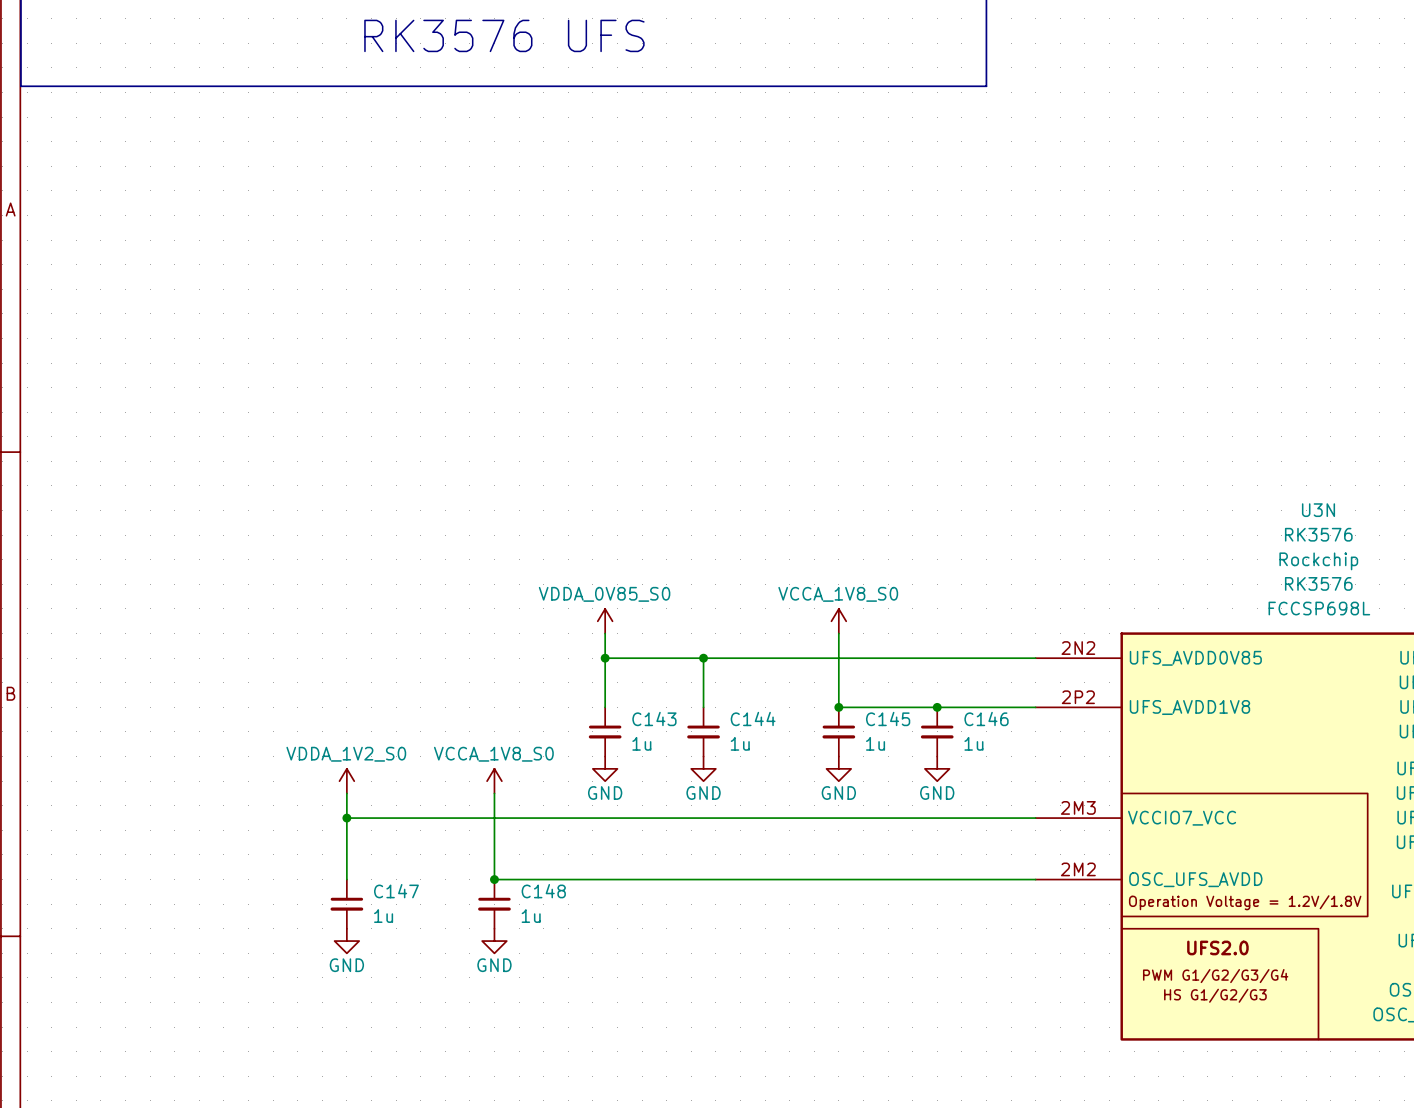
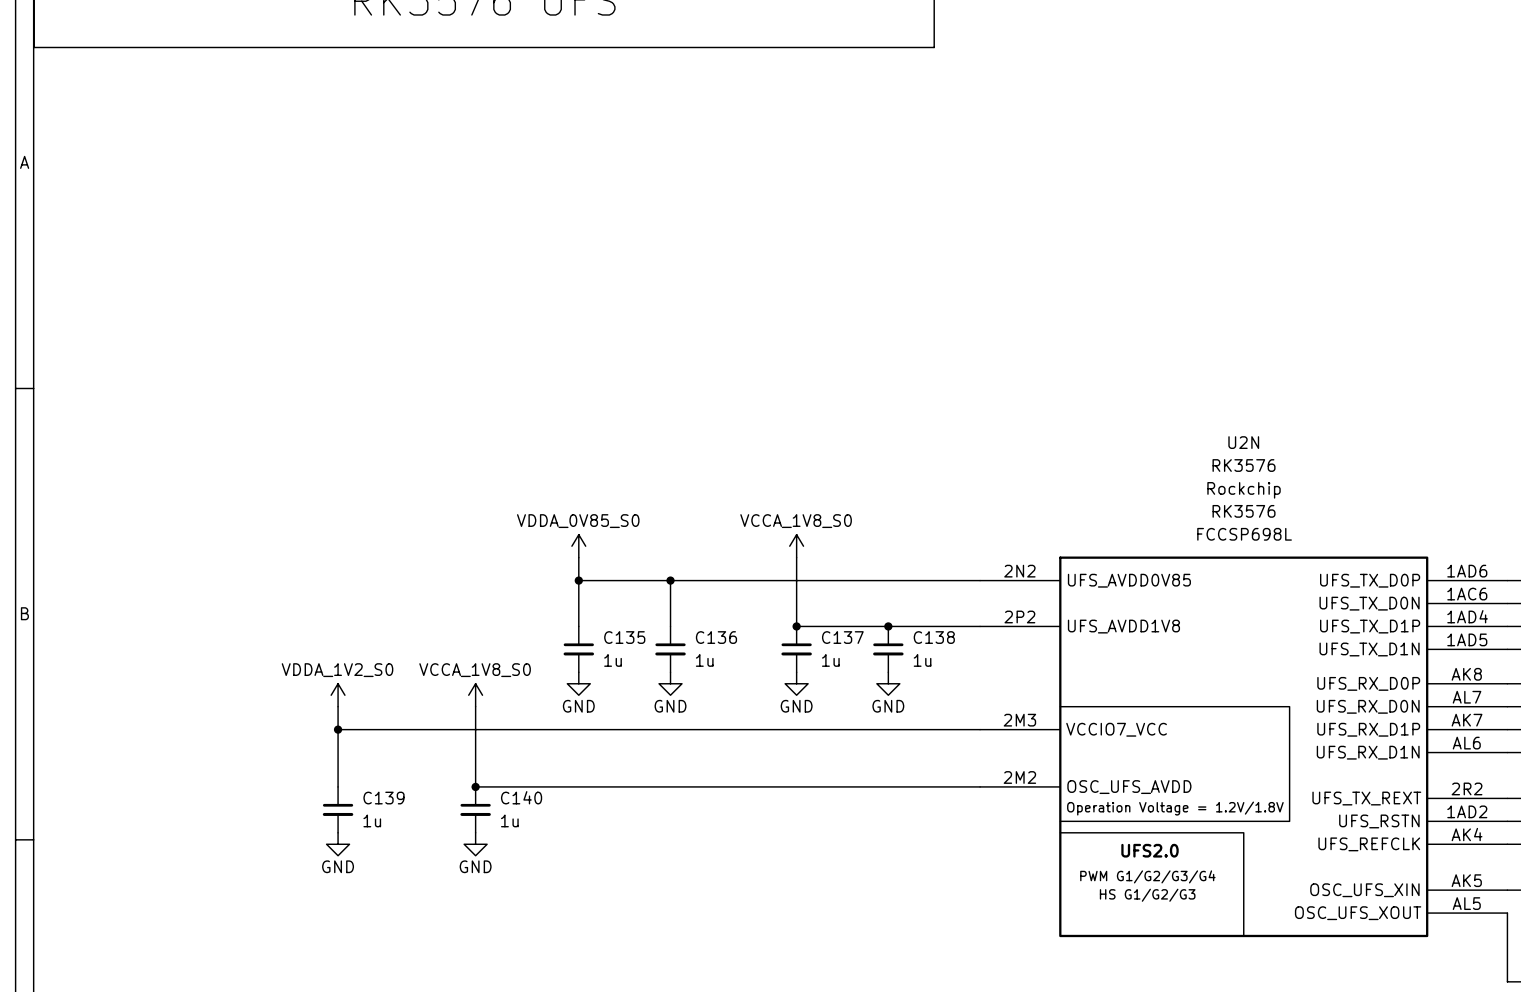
U3N name: U3N (1318, 510) -> U2N (1243, 442)
C143 name: C143 (654, 718) -> C135 (624, 637)
C144 name: C144 (753, 718) -> C136 (716, 637)
C145 name: C145 (888, 718) -> C137 (842, 637)
C146 name: C146 (986, 718) -> C138 (934, 637)
C147 name: C147 (396, 891) -> C139 (383, 798)
C148 name: C148 (543, 891) -> C140 (521, 797)

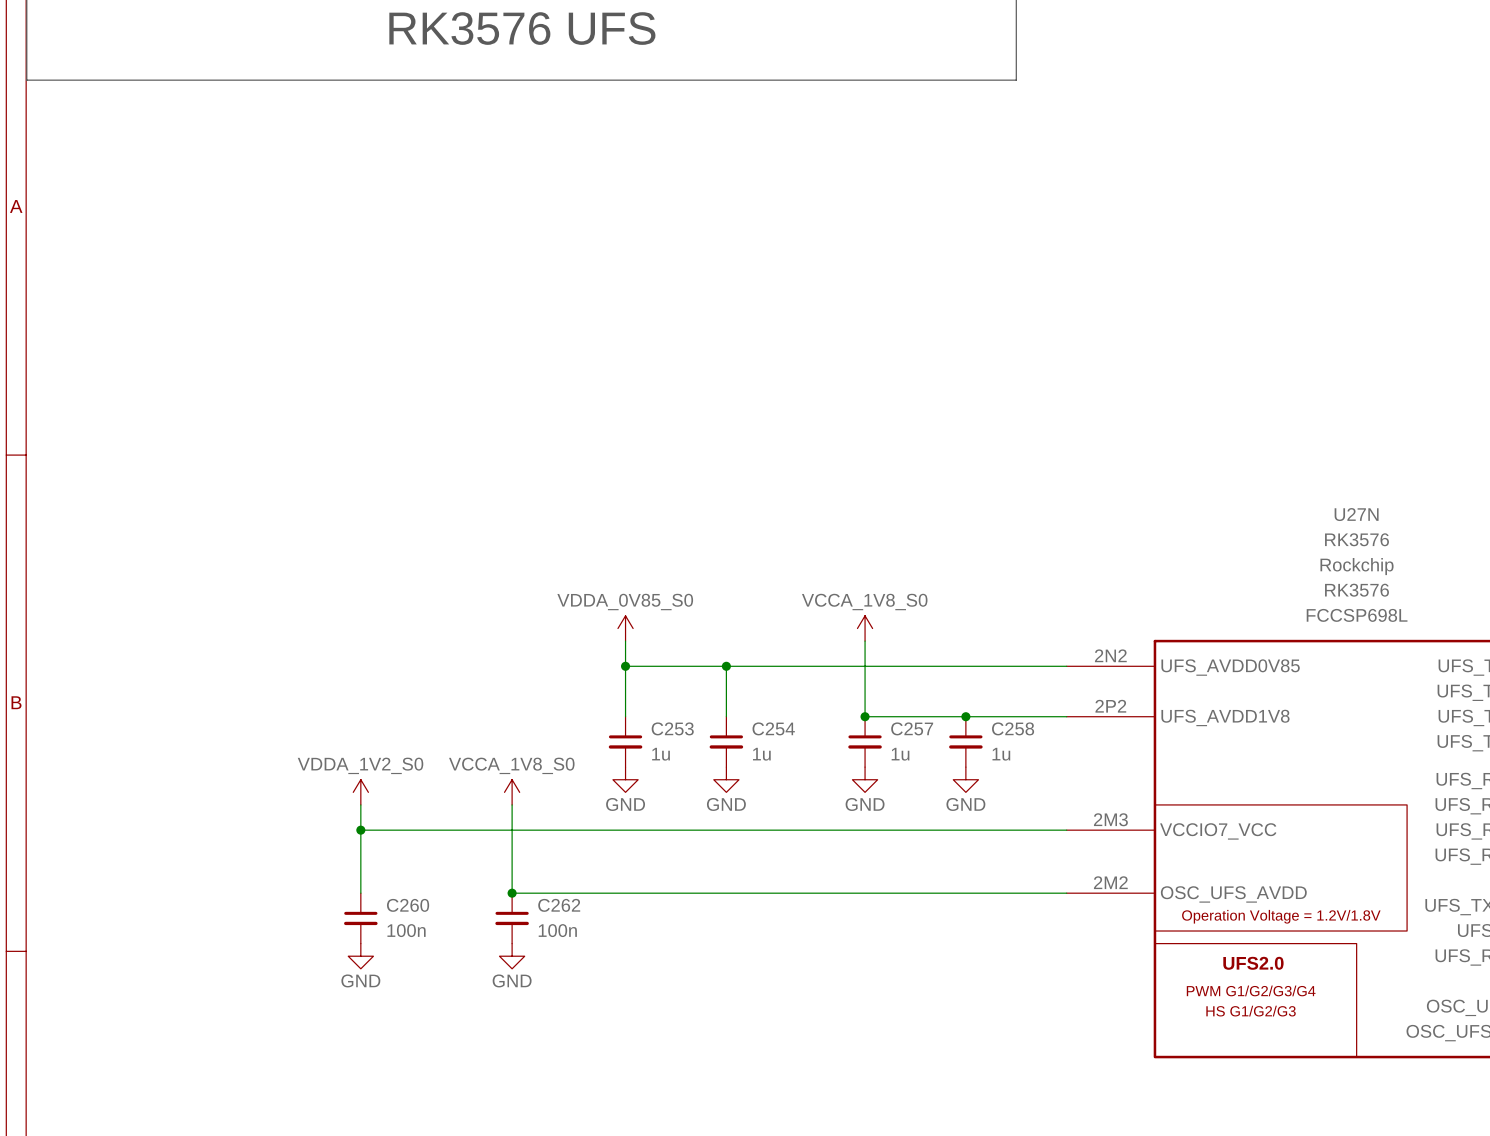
U2N name: U2N (1243, 442) -> U27N (1356, 514)
C135 name: C135 (624, 637) -> C253 (672, 728)
C136 name: C136 (716, 637) -> C254 (773, 728)
C137 name: C137 (842, 637) -> C257 (912, 728)
C138 name: C138 (934, 637) -> C258 (1013, 728)
C140 name: C140 (521, 797) -> C262 (559, 905)
C139 name: C139 (383, 798) -> C260 (408, 905)
C139 value: 1u (372, 820) -> 100n (406, 930)
C140 value: 1u (509, 820) -> 100n (557, 930)

